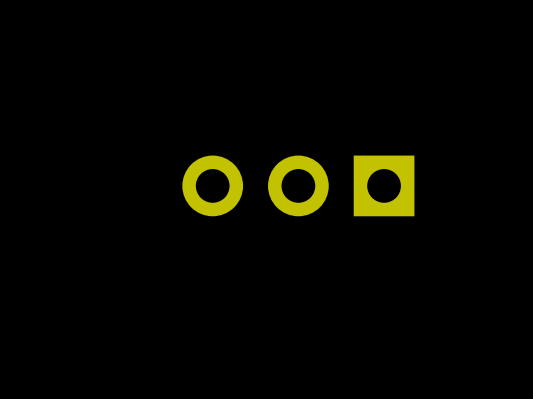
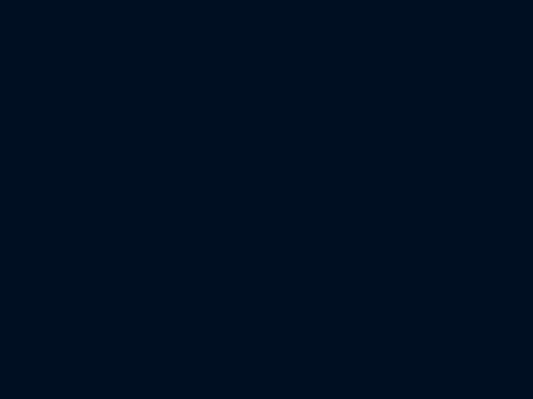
part: (298, 185) -> none

